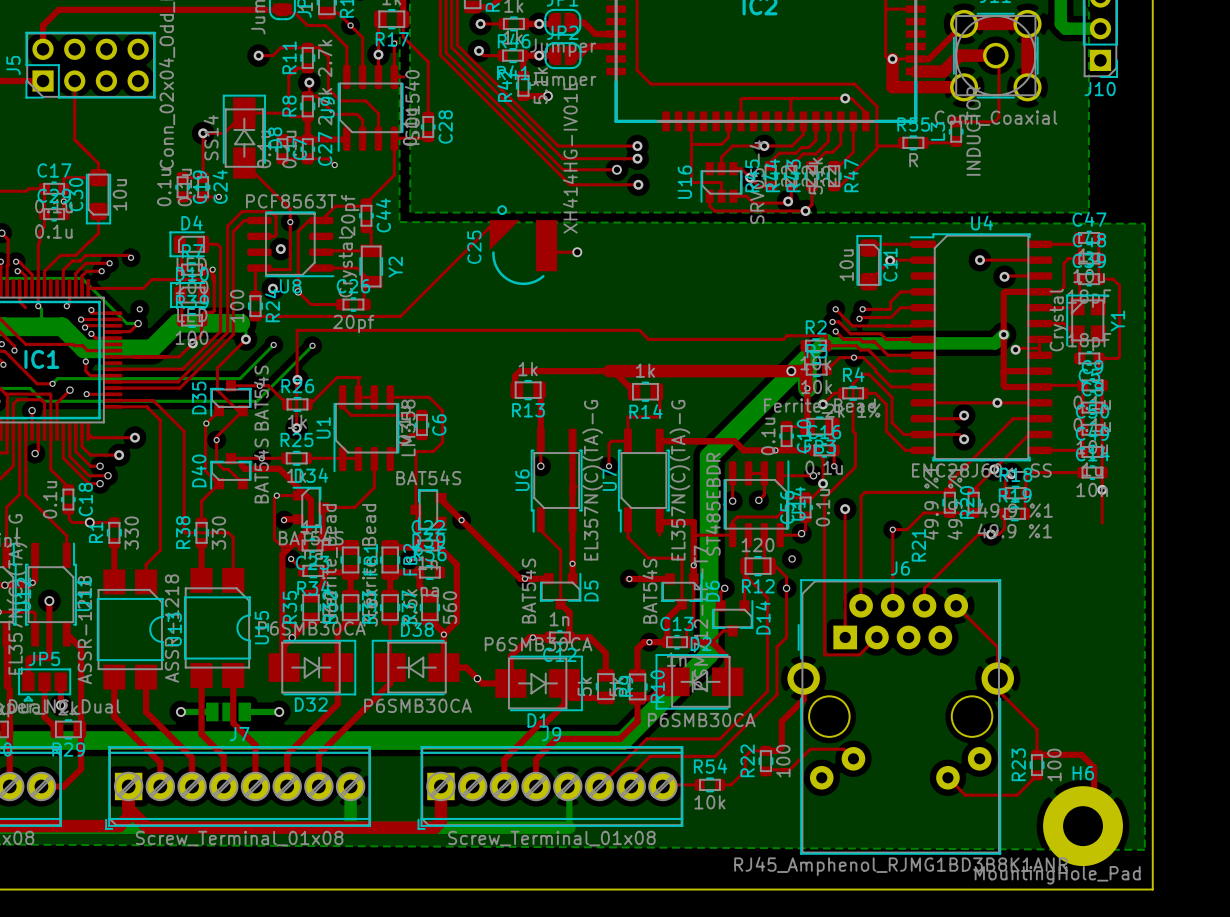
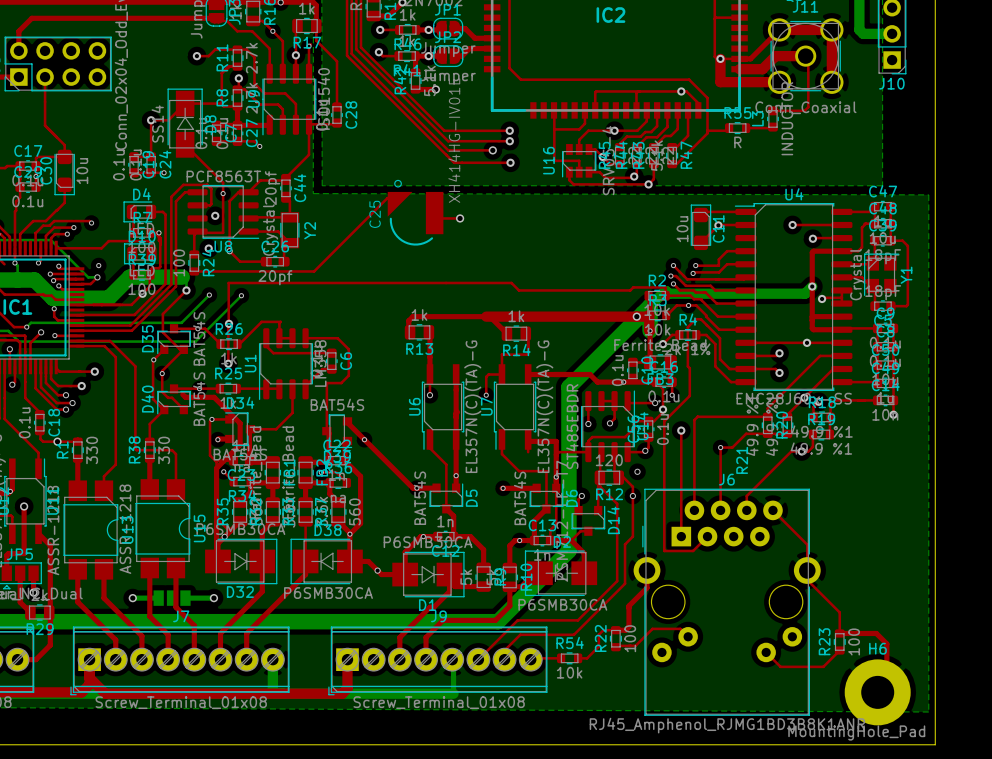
top track: (394, 76) (403, 76) -> none
top track: (1102, 489) (1102, 523) -> none

